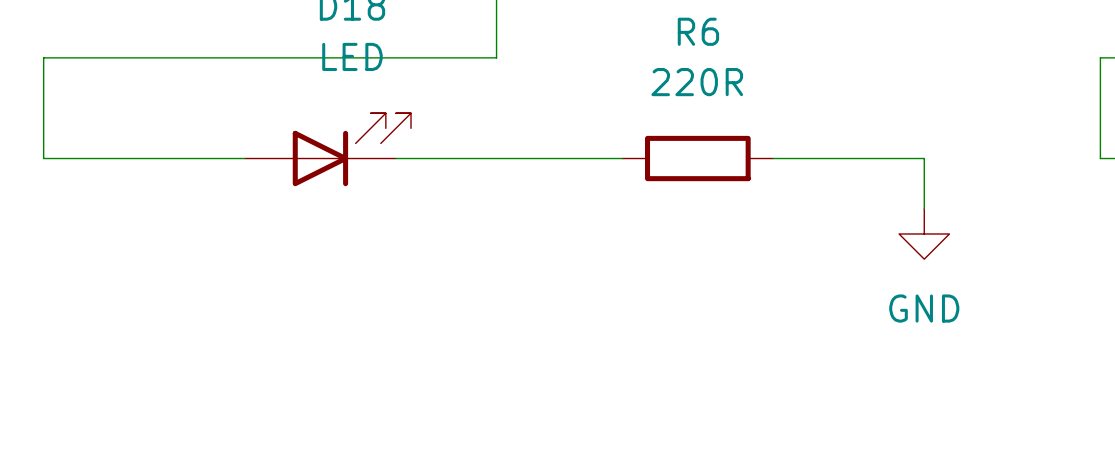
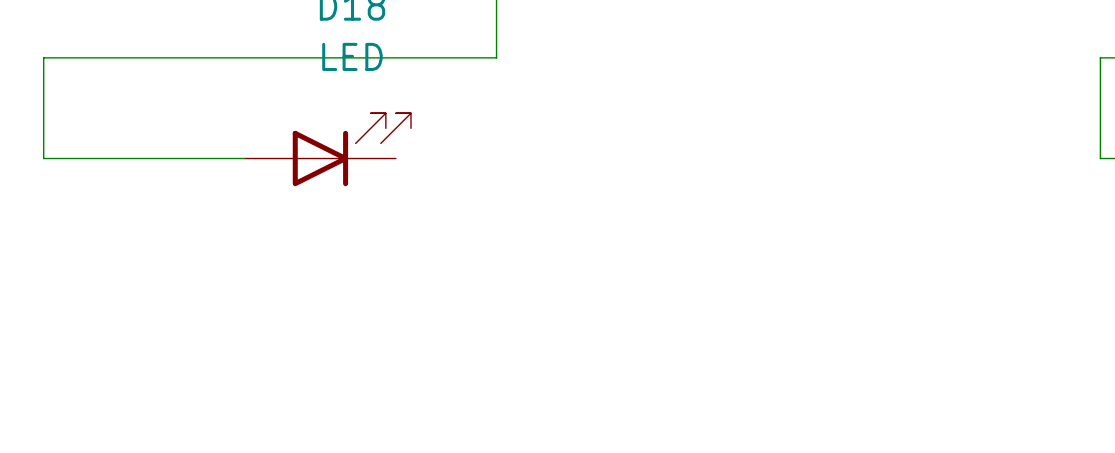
wire: (395, 158) (622, 158) -> none
R6: 220R (697, 158) -> none
wire: (773, 158) (924, 158) (924, 208) -> none
power symbol: GND (924, 234) -> none

